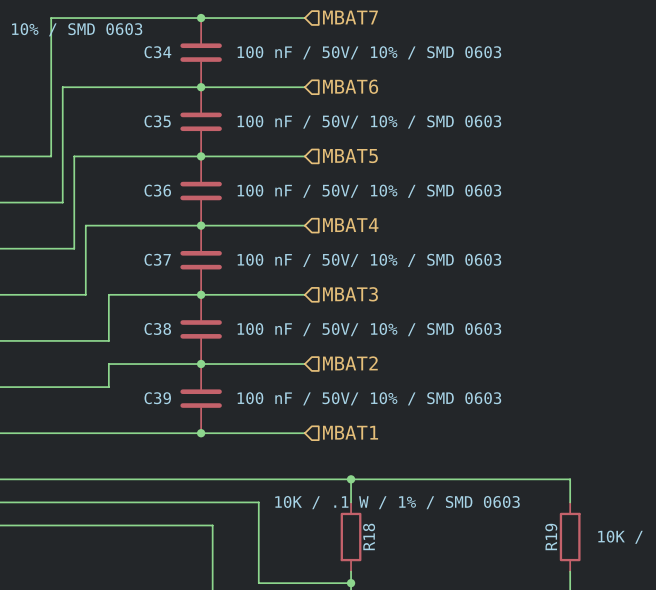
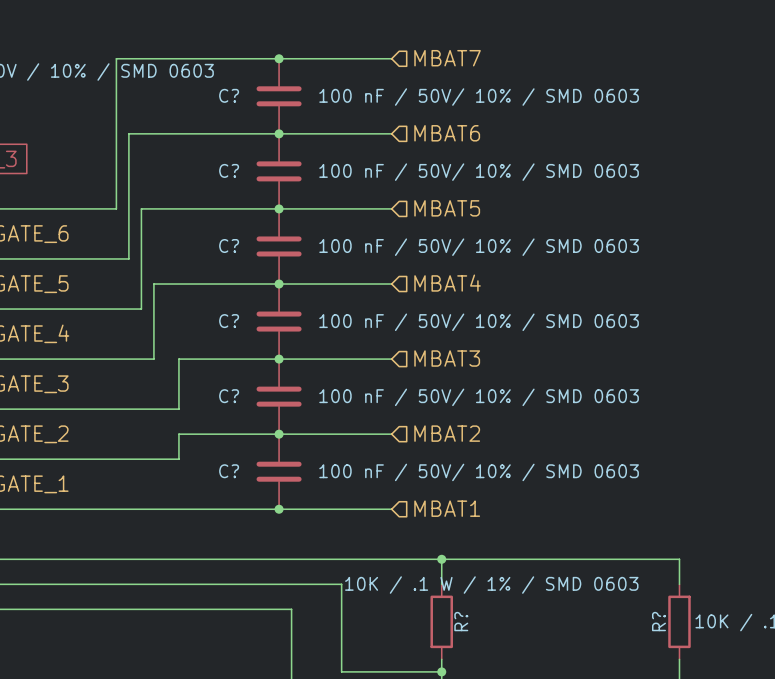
C34 name: C34 (157, 52) -> C? (229, 95)
C35 name: C35 (157, 121) -> C? (229, 170)
C36 name: C36 (157, 190) -> C? (229, 246)
C37 name: C37 (157, 259) -> C? (229, 321)
C38 name: C38 (157, 329) -> C? (229, 396)
C39 name: C39 (157, 398) -> C? (229, 471)
R18 name: R18 (369, 536) -> R? (461, 621)
R19 name: R19 (551, 537) -> R? (658, 621)

